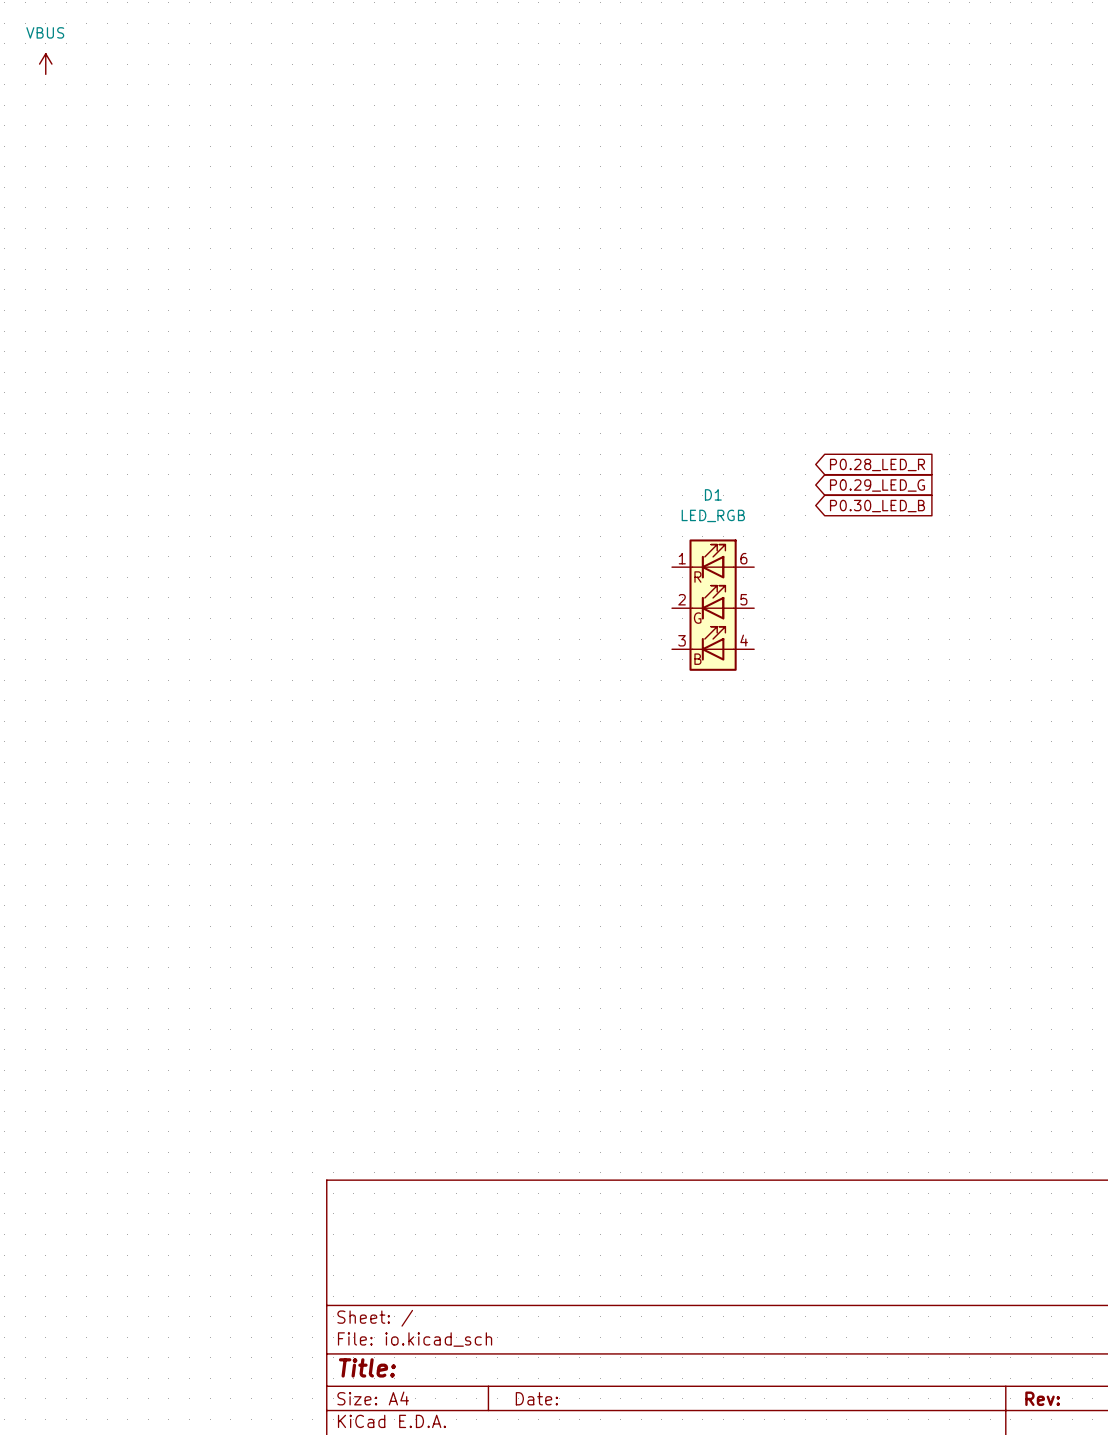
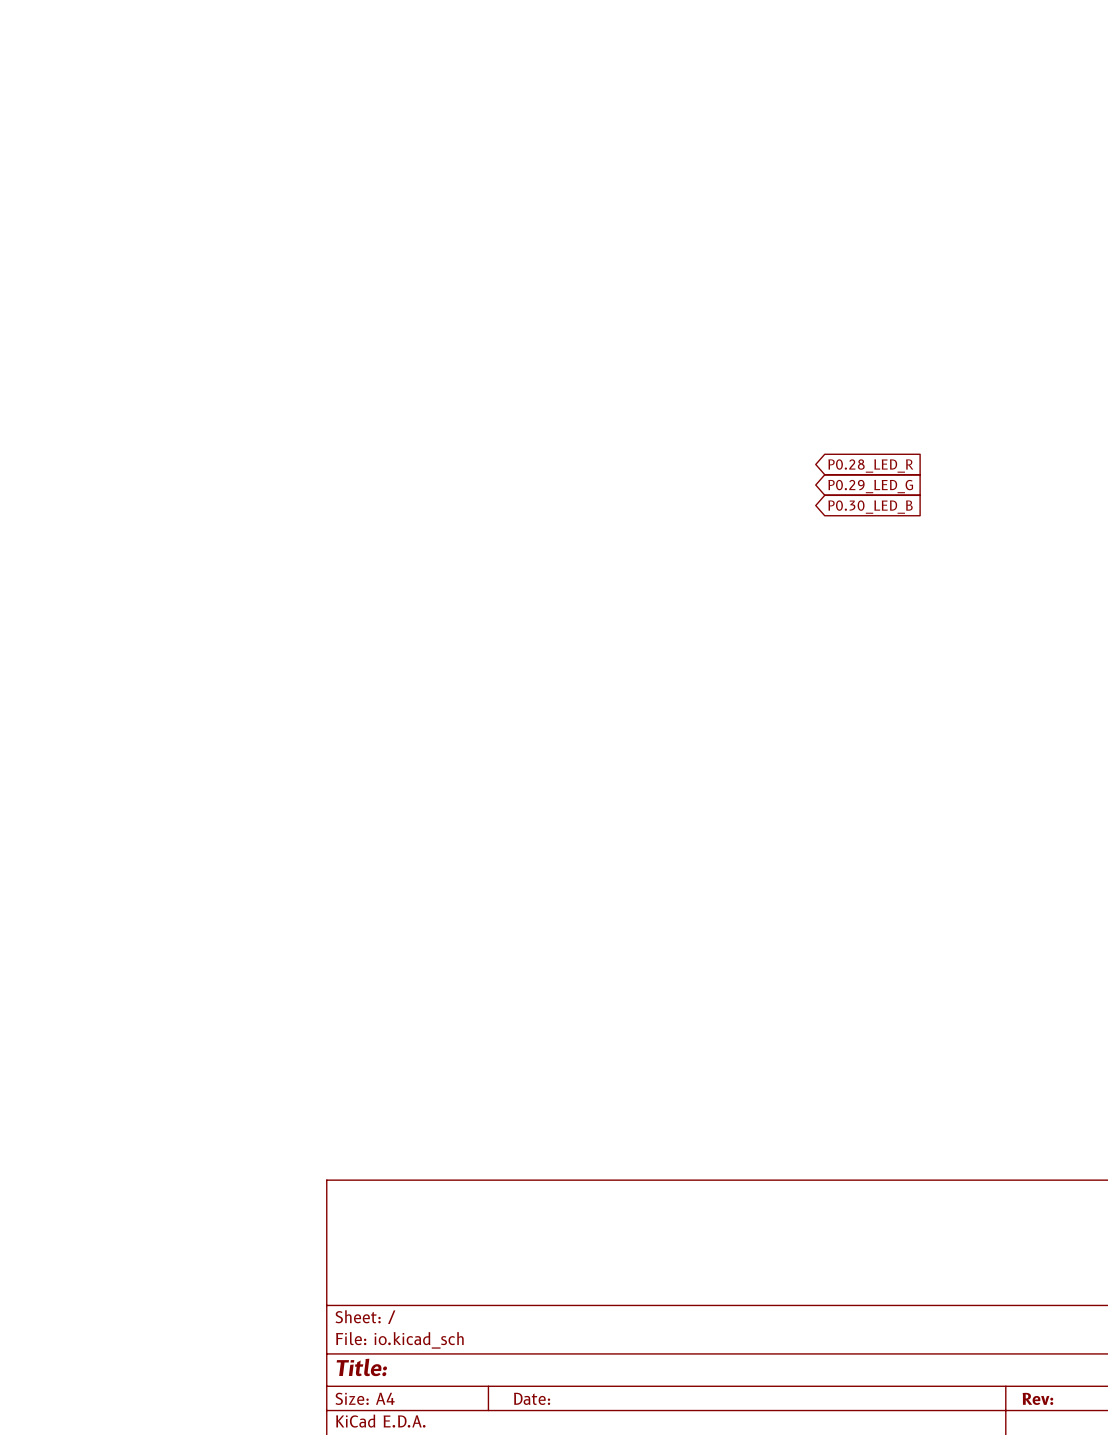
power symbol: VBUS (45, 64) -> none
D1: LED_RGB (713, 605) -> none

